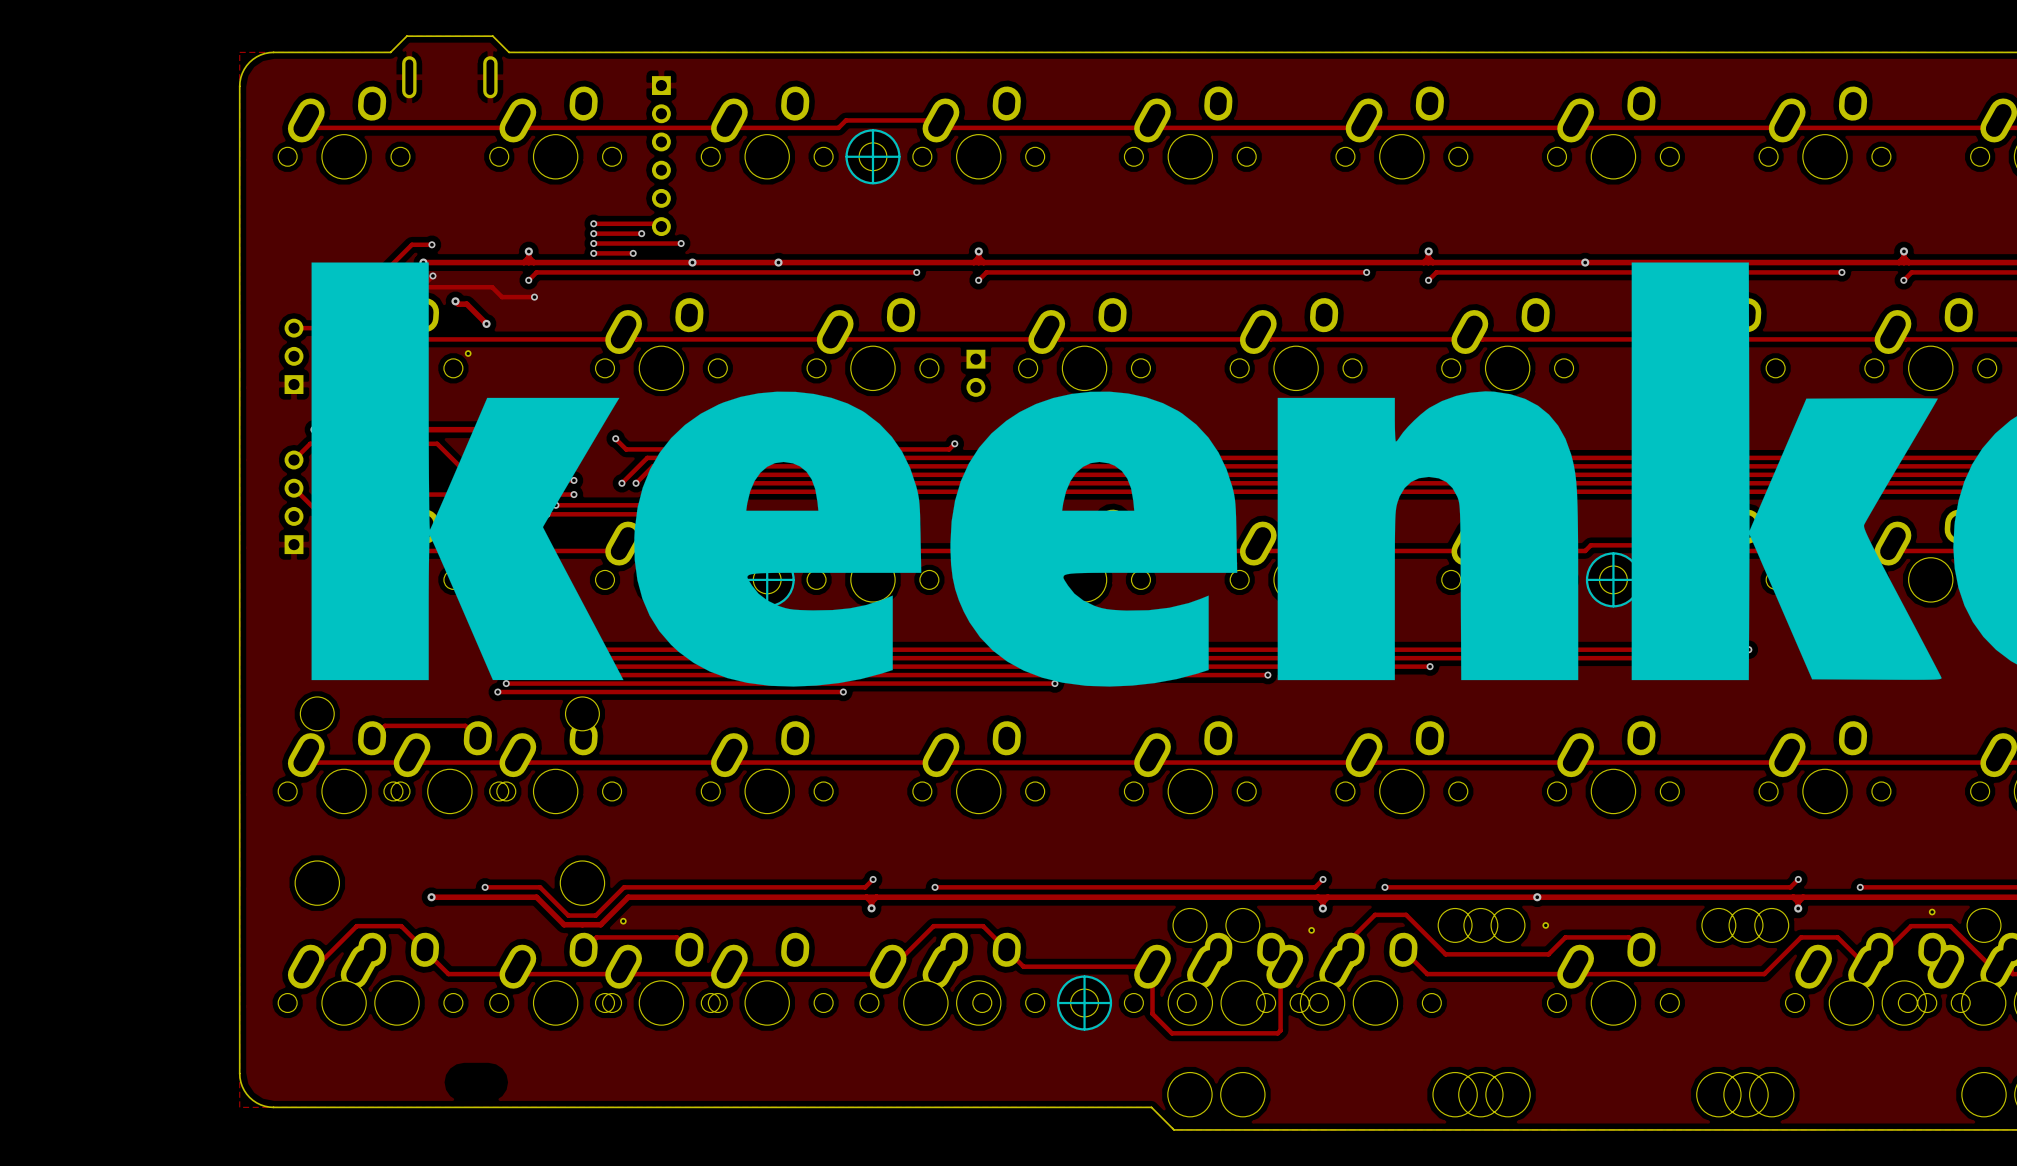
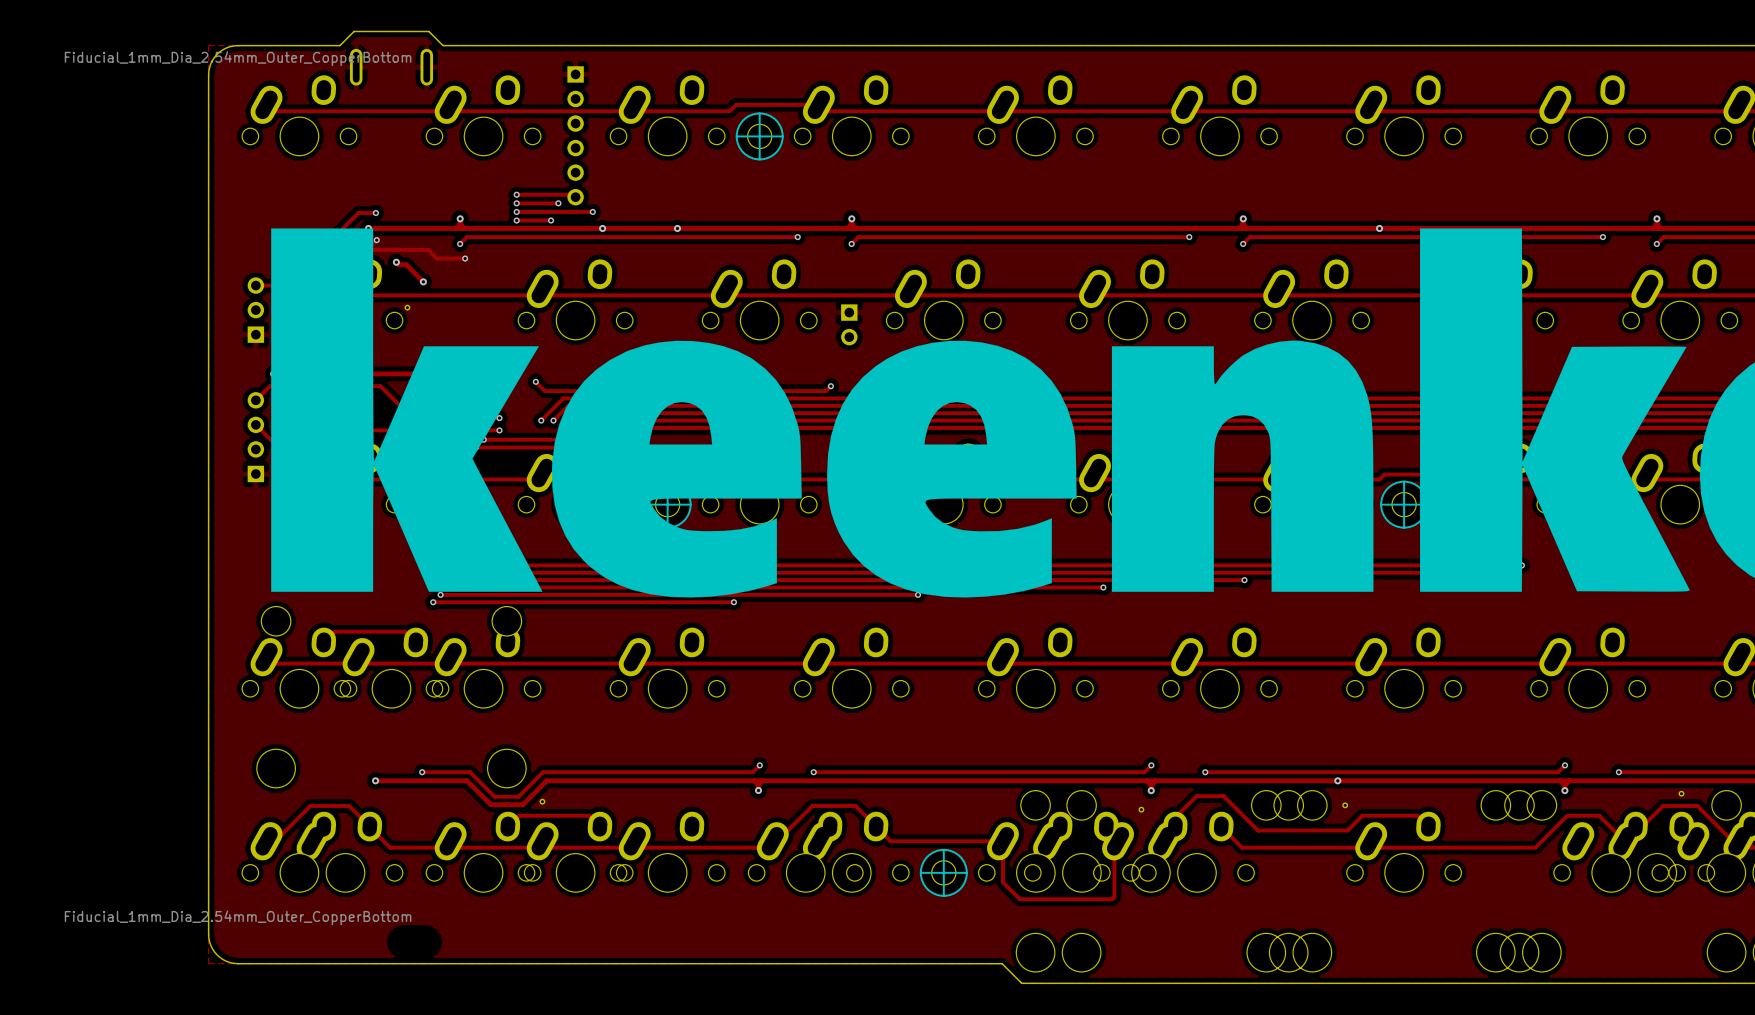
part: none -> Fiducial_1mm_Dia_2.54mm_Outer_CopperBottom (238, 58)
part: none -> Fiducial_1mm_Dia_2.54mm_Outer_CopperBottom (238, 917)

